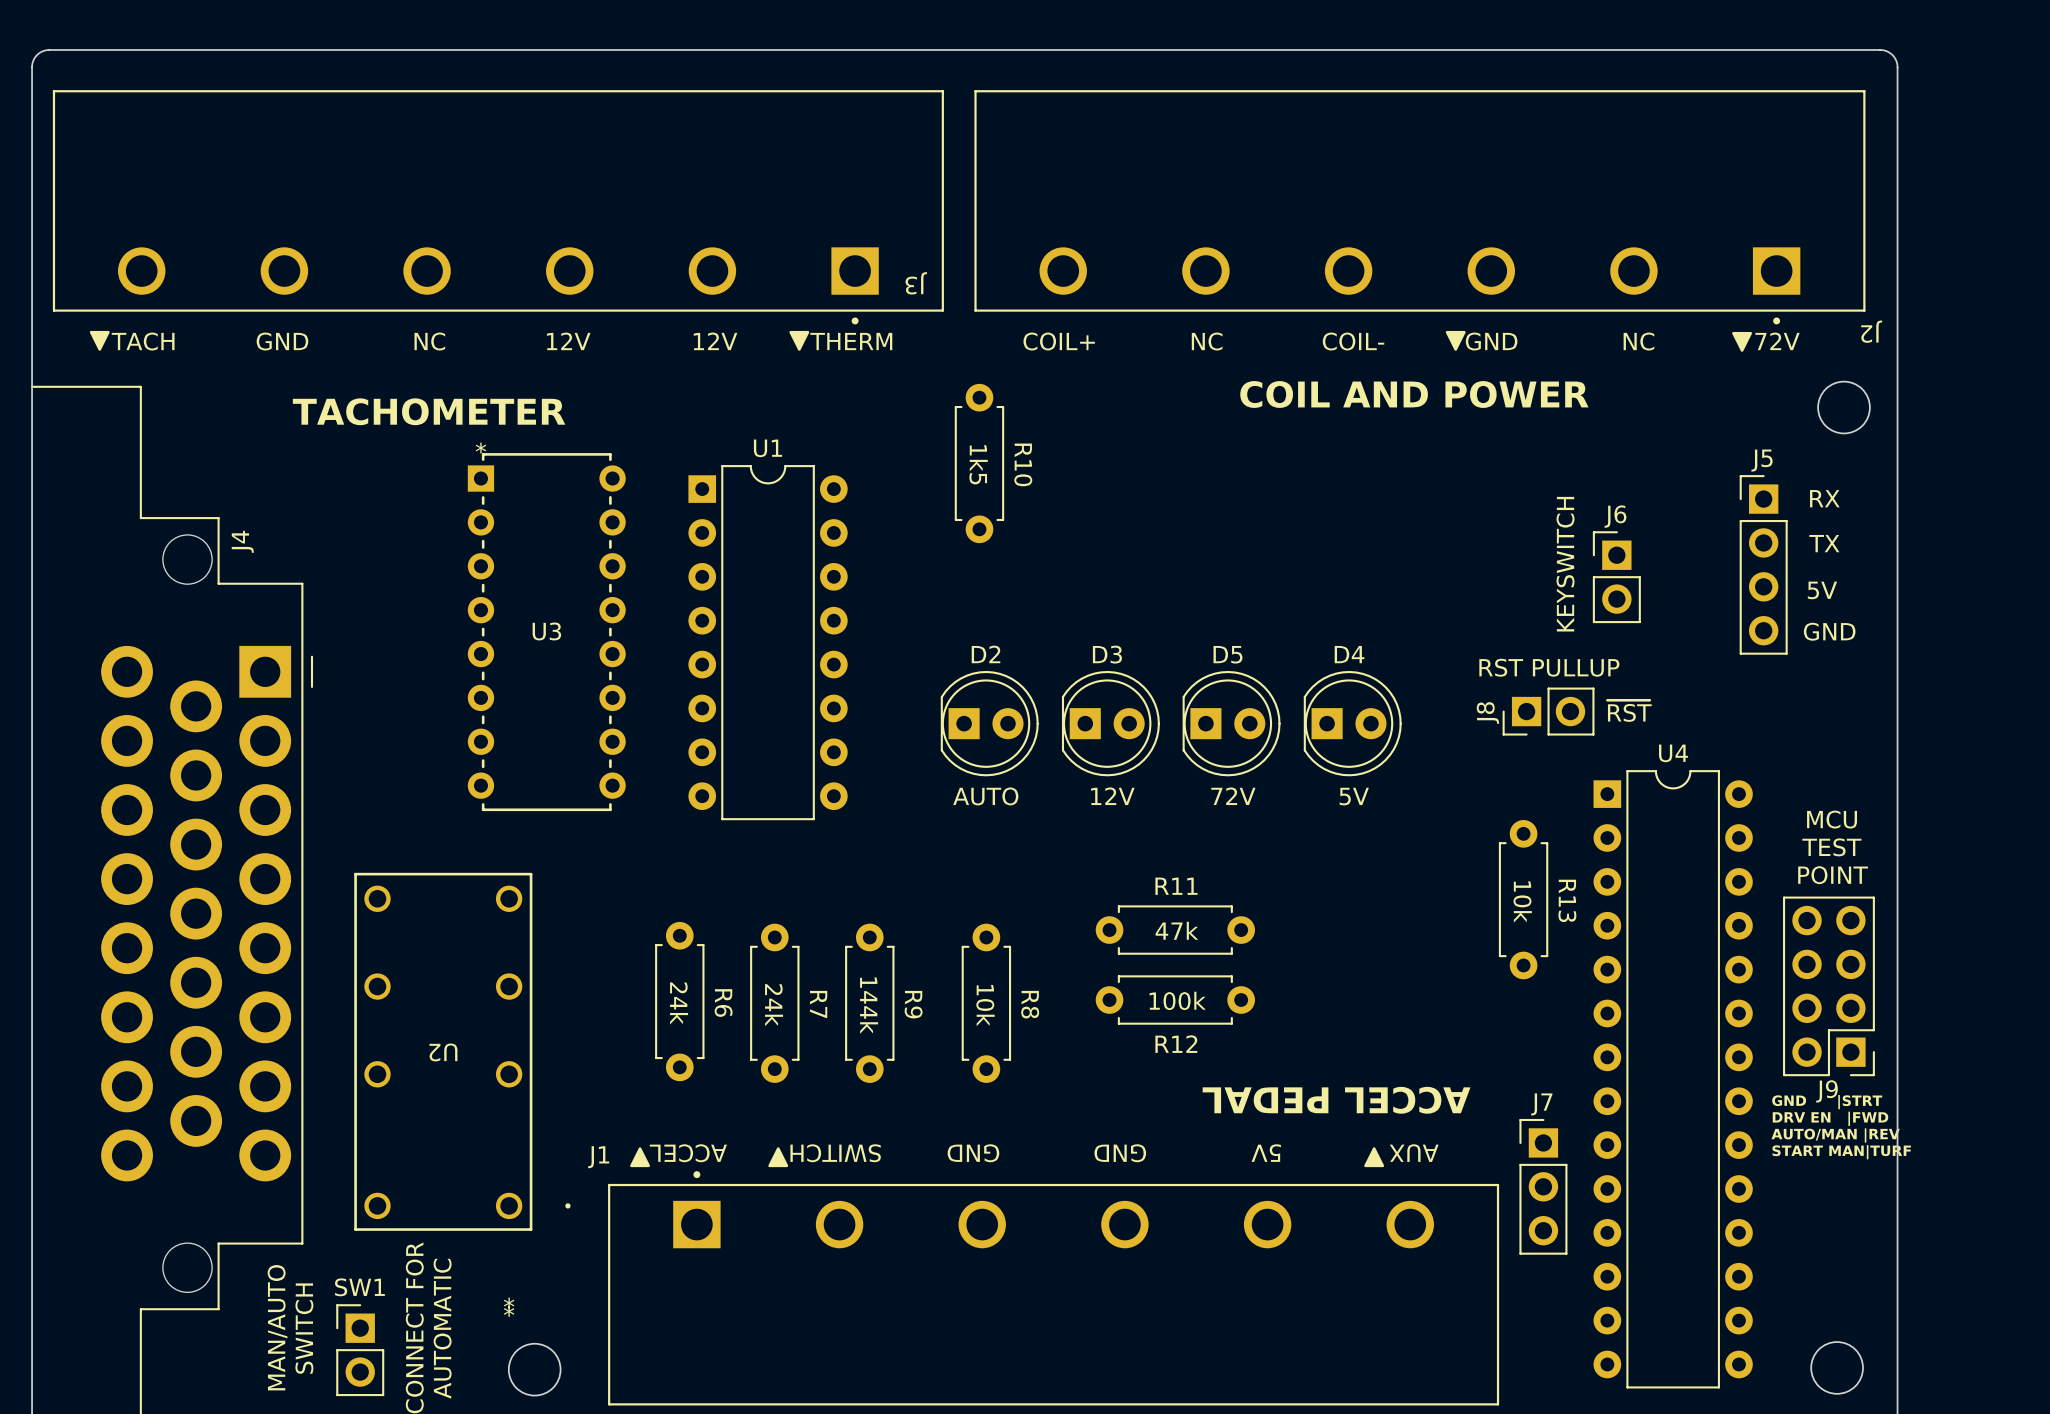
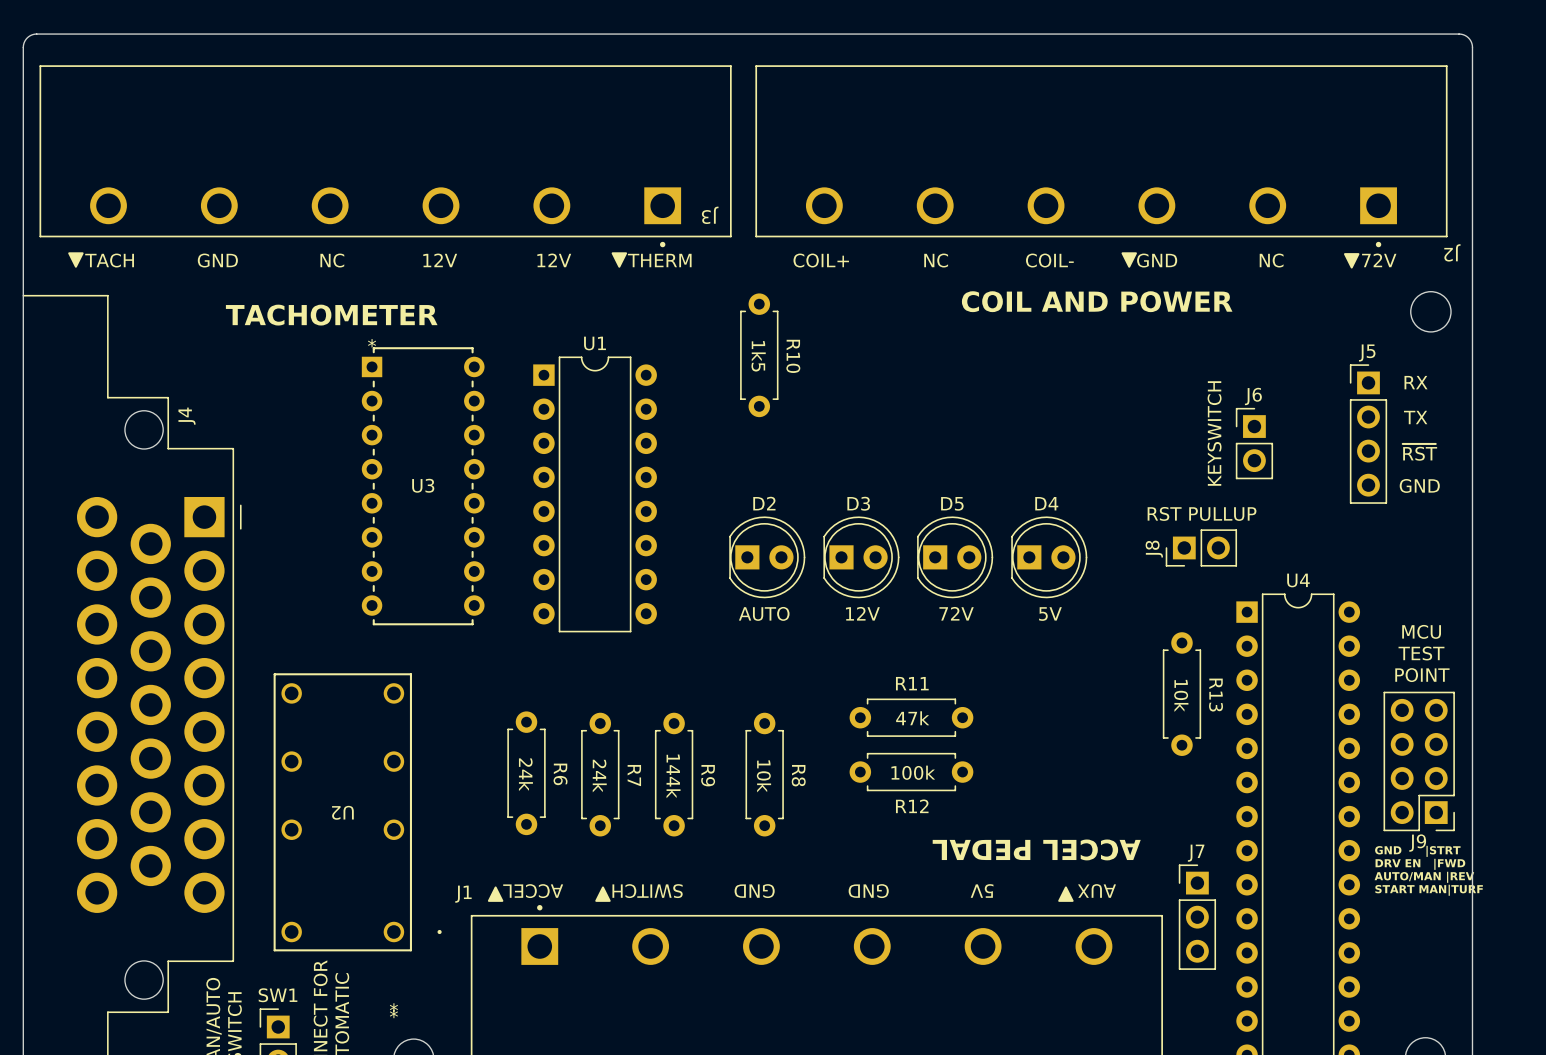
text: 5V (1822, 590) -> ~{RST} (1419, 452)
text: ~{RST} (1629, 711) -> none

